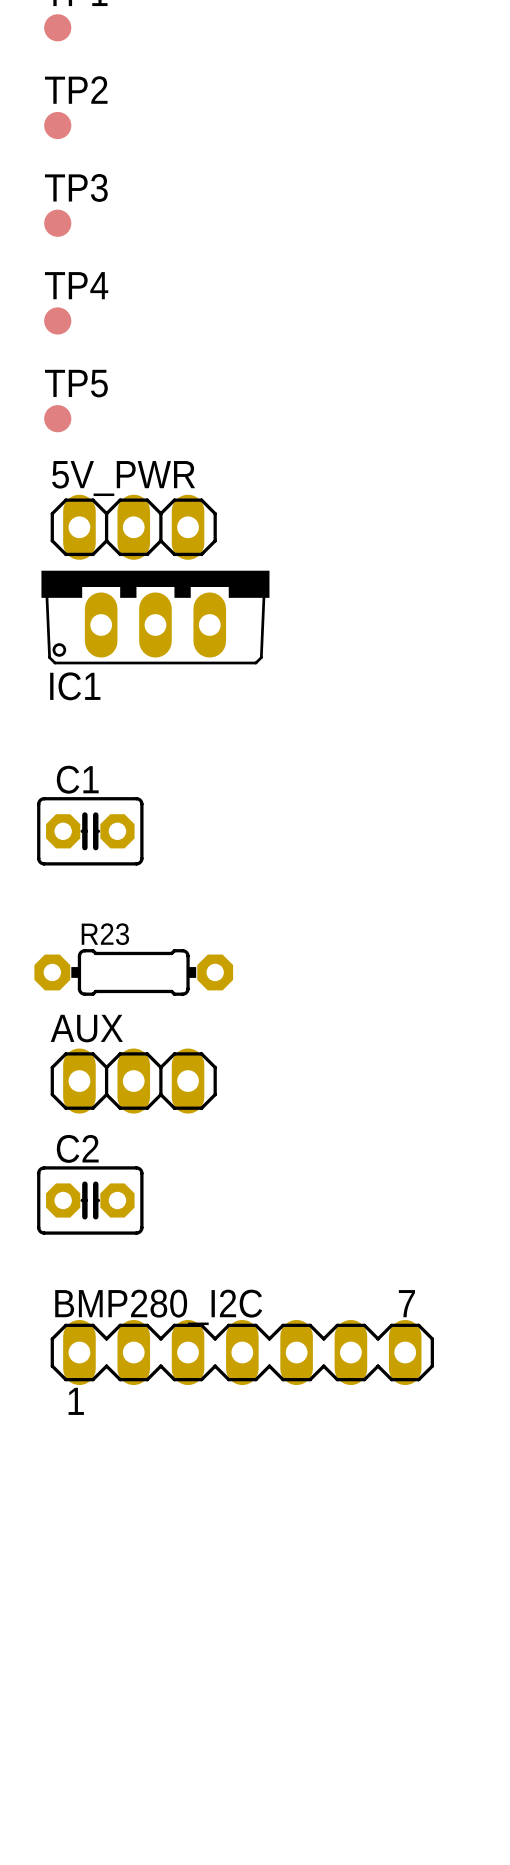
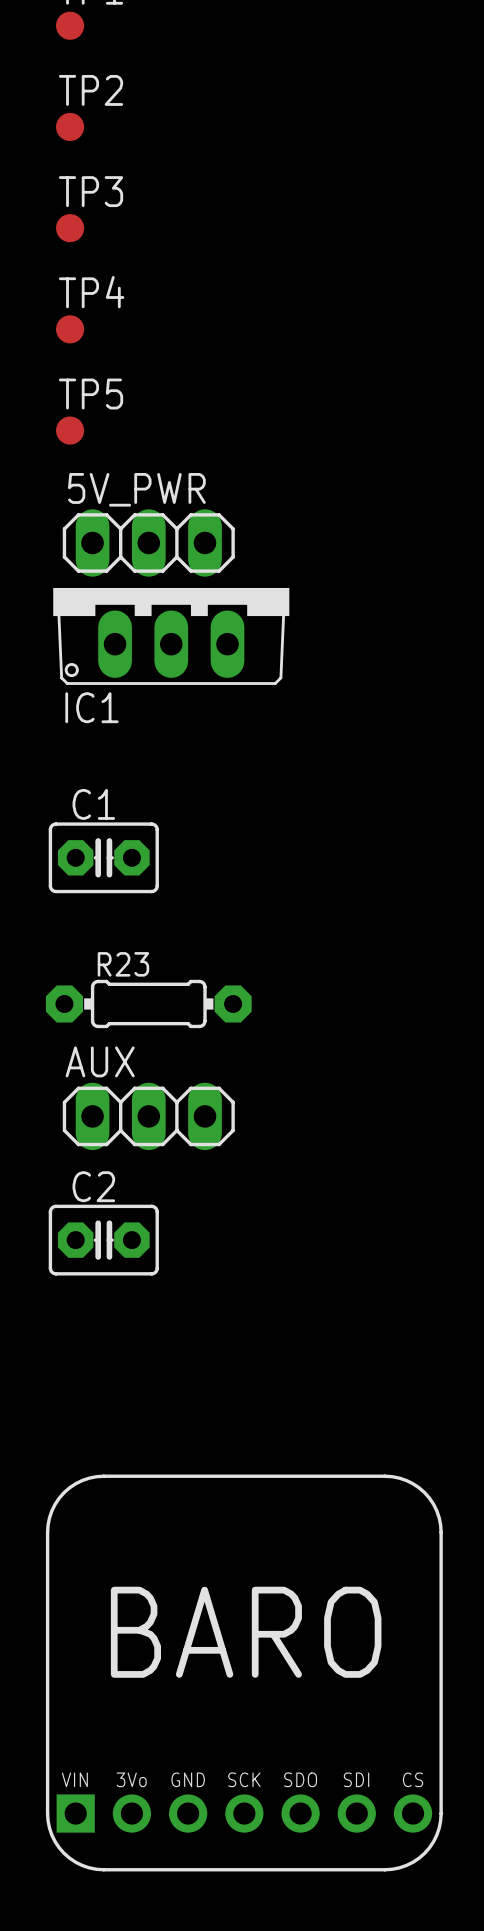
BMP280_I2C: (242, 1352) -> none
part: none -> (244, 1672)

